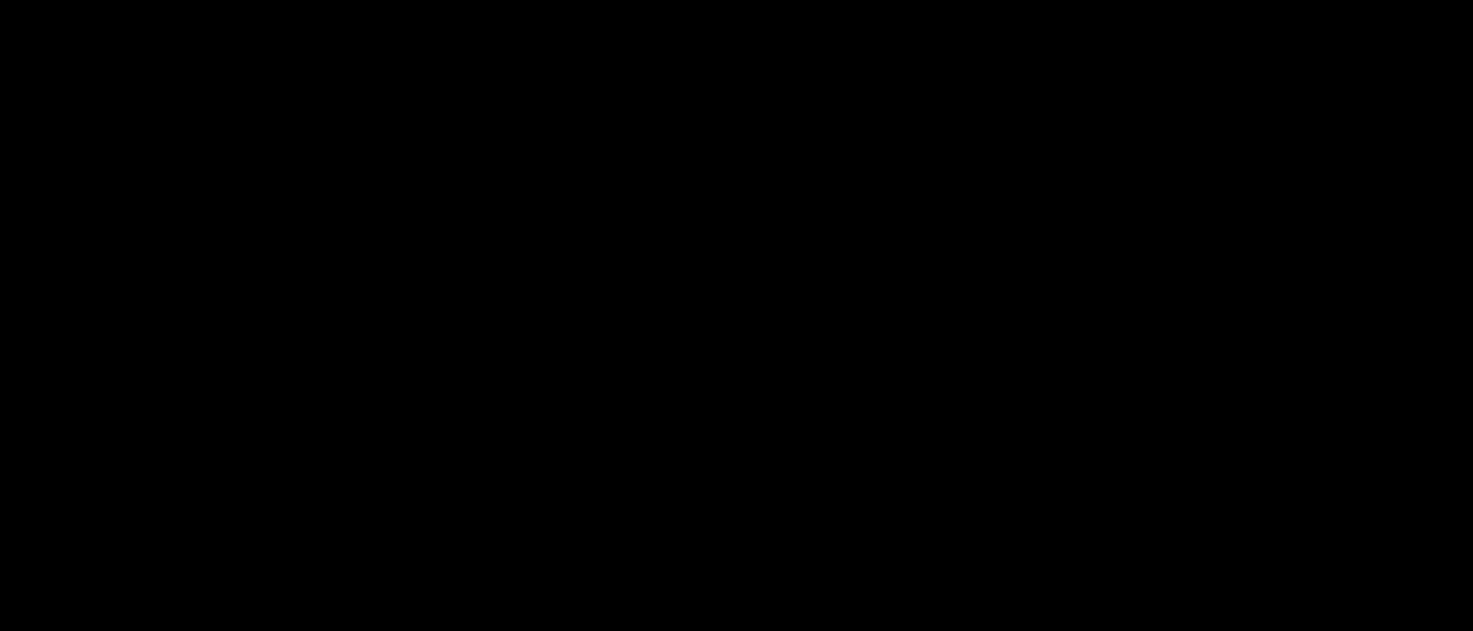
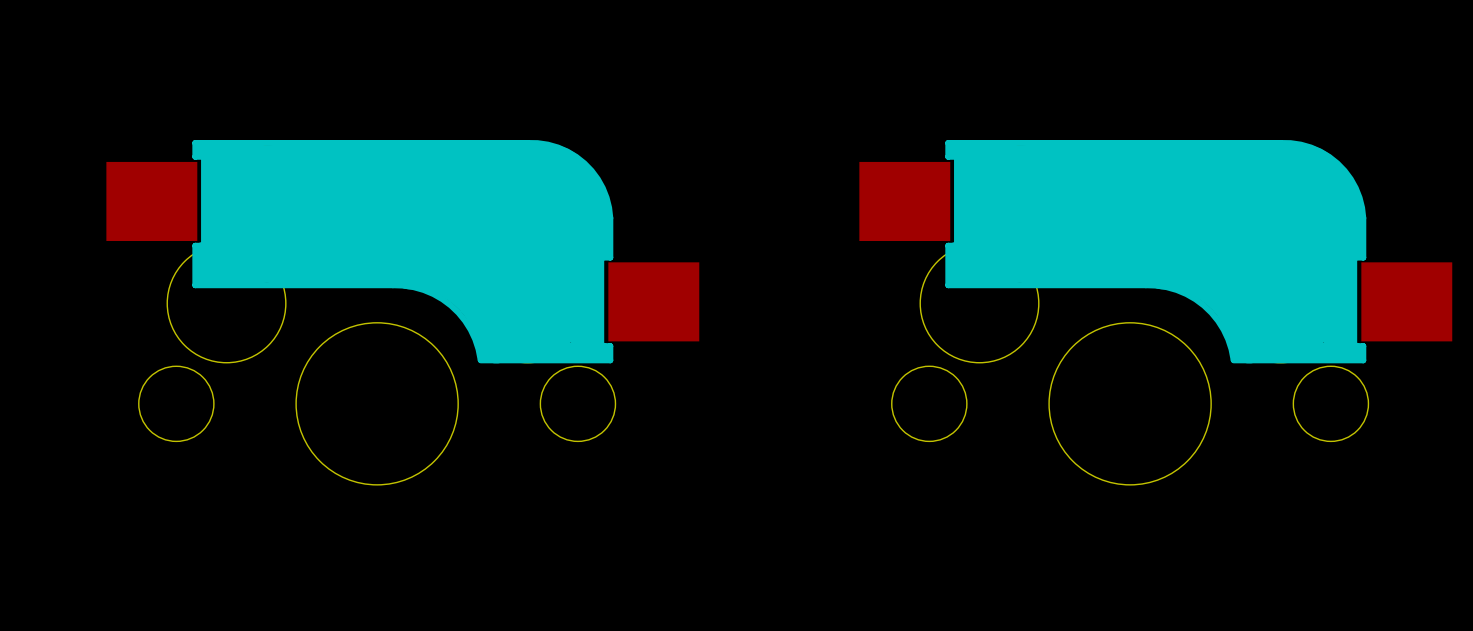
part: none -> (402, 312)
part: none -> (1155, 312)

